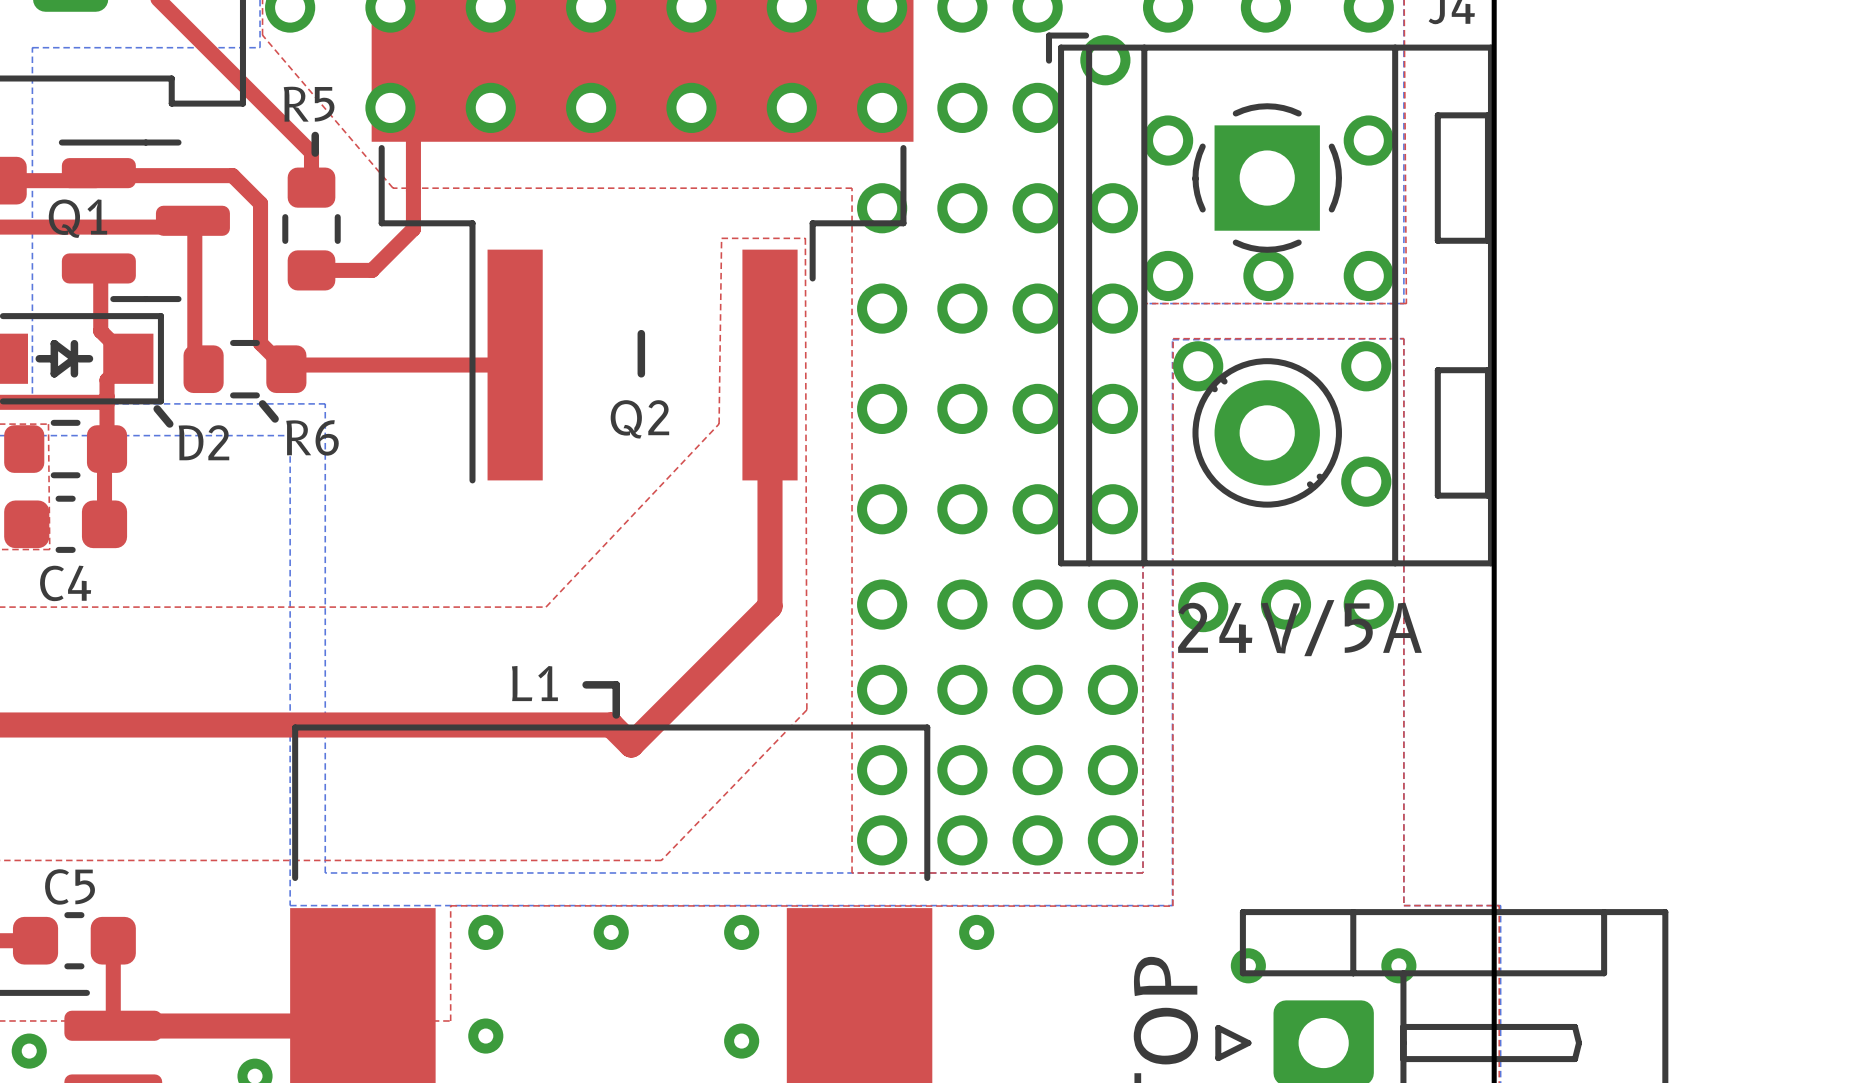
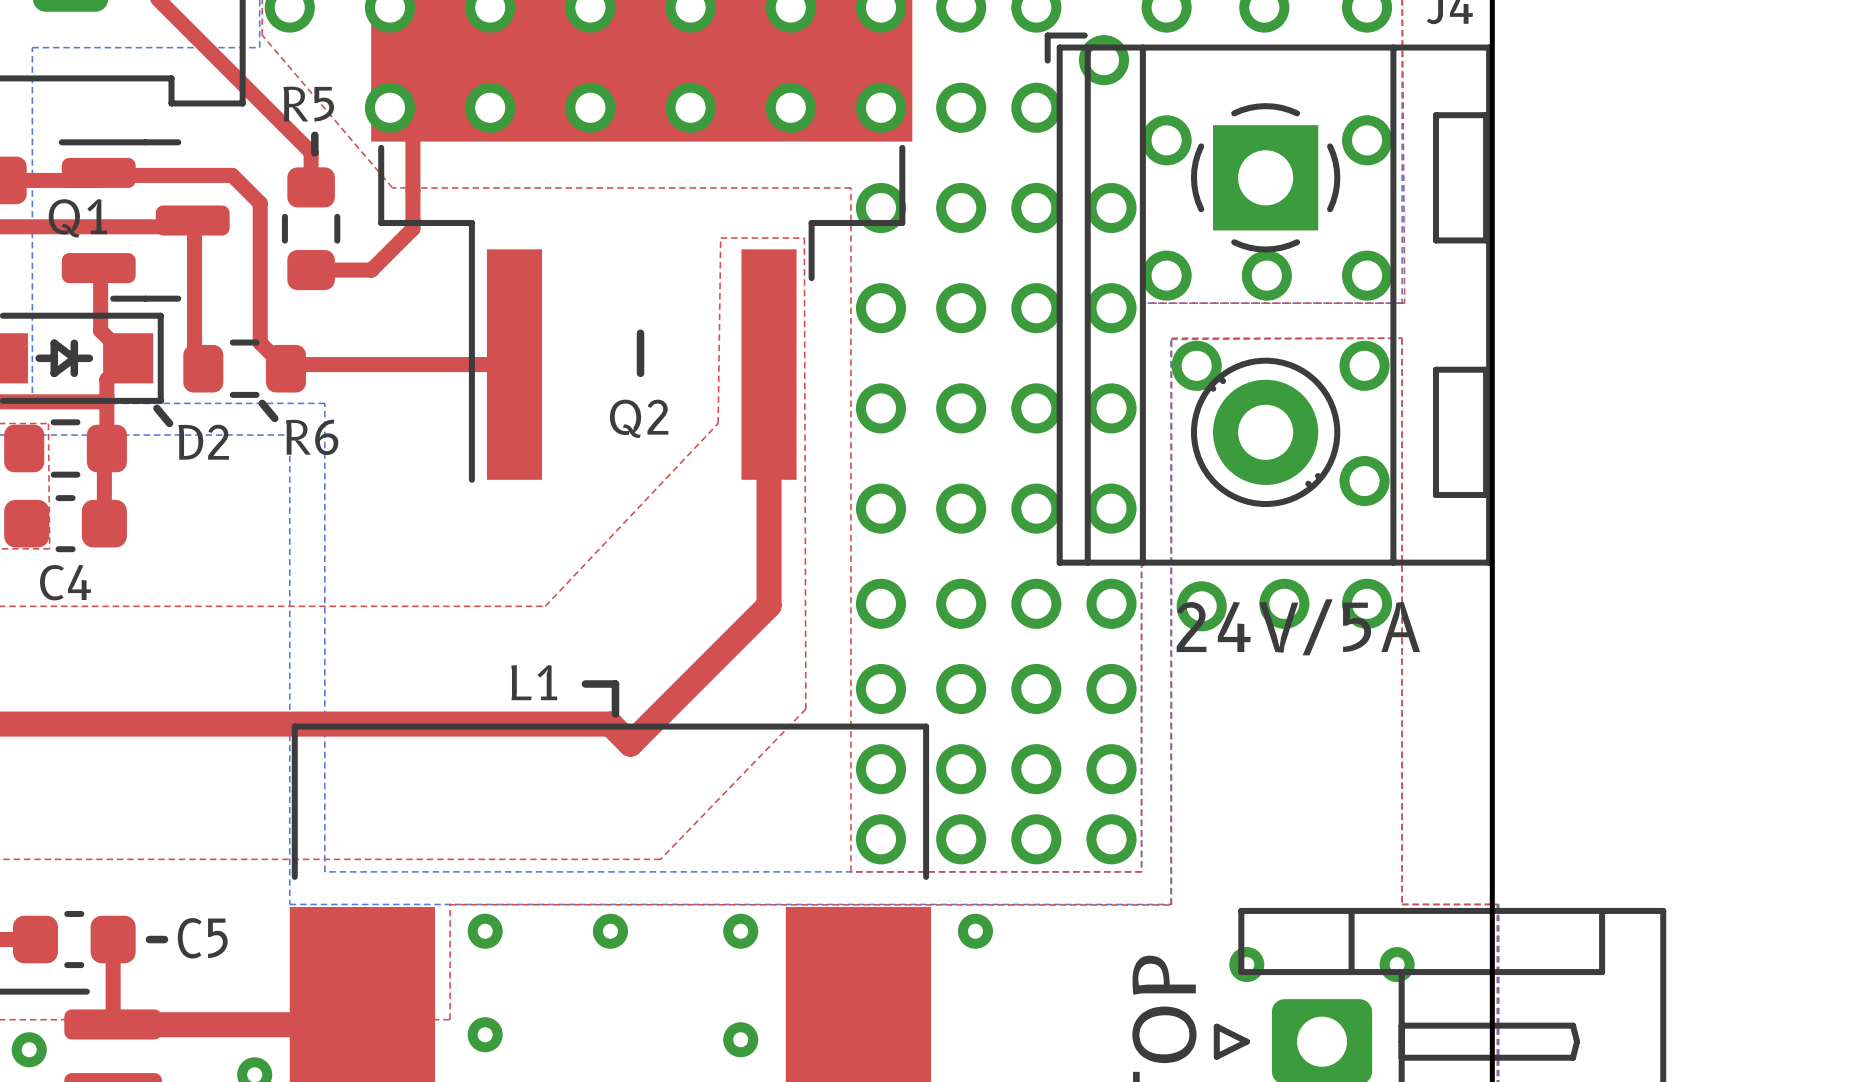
C5 name position: C5 (70, 886) -> C5 (202, 938)
line: none -> (149, 939) (164, 939)

